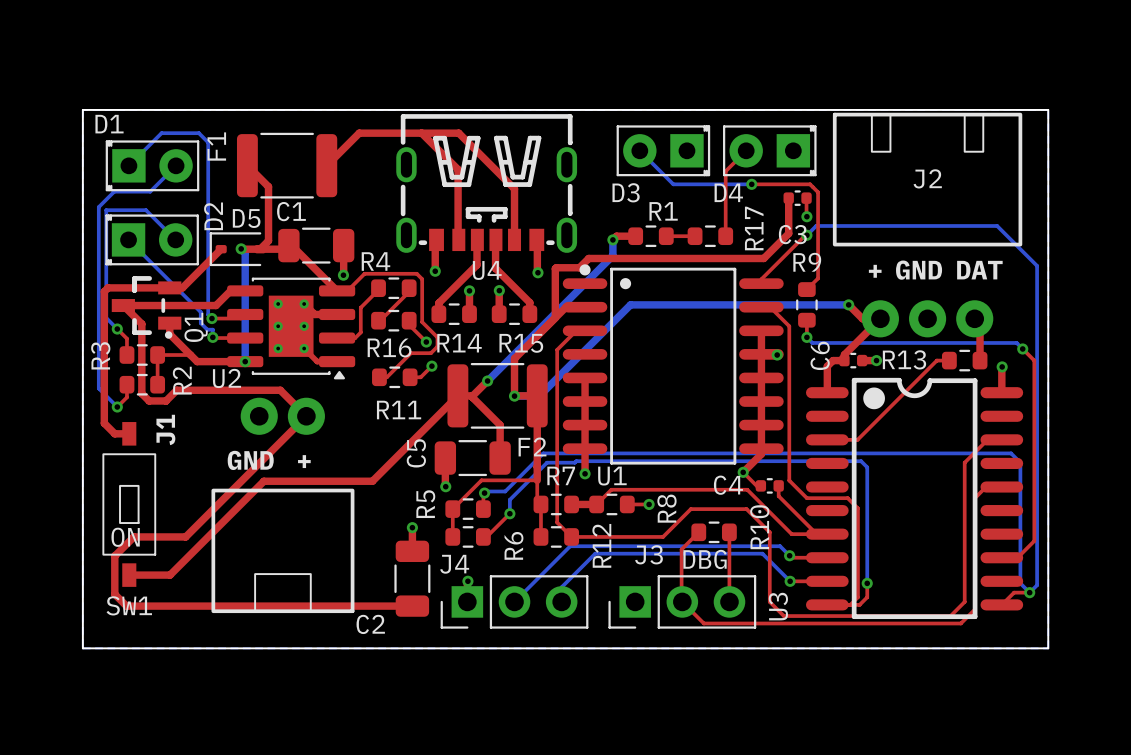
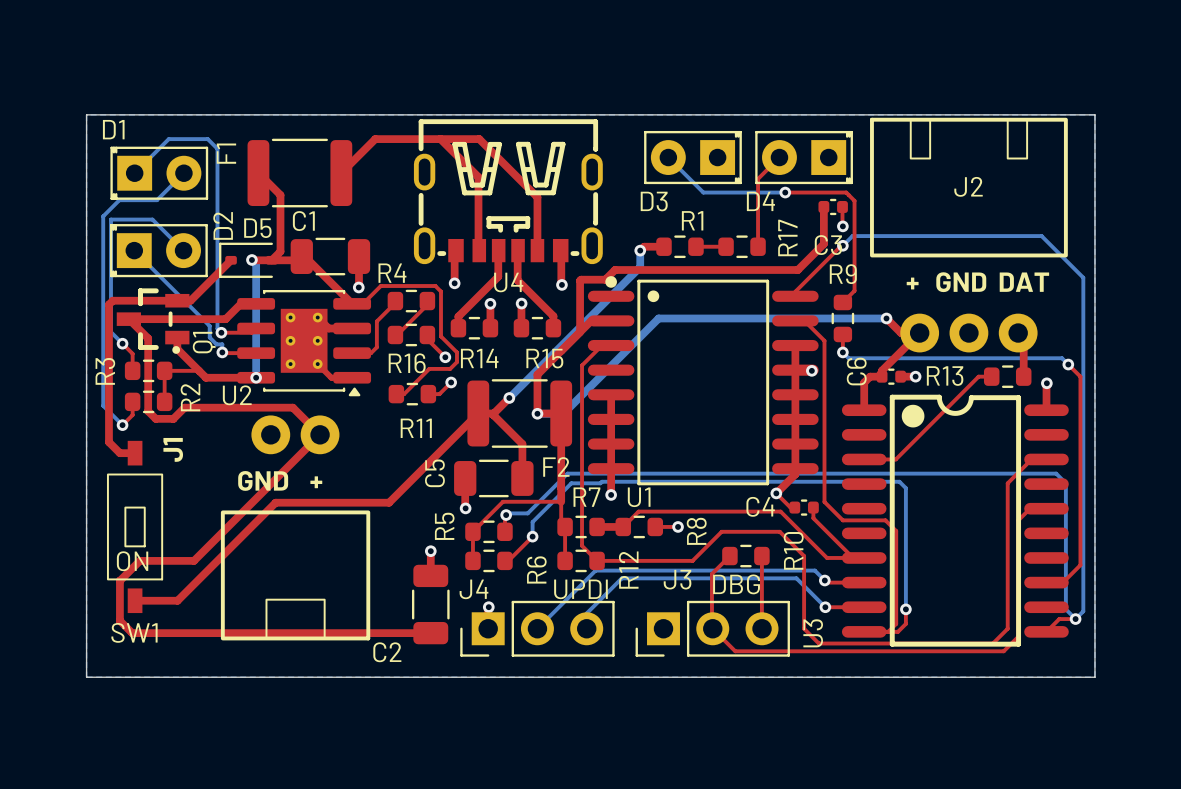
text: none -> UPDI (580, 589)

